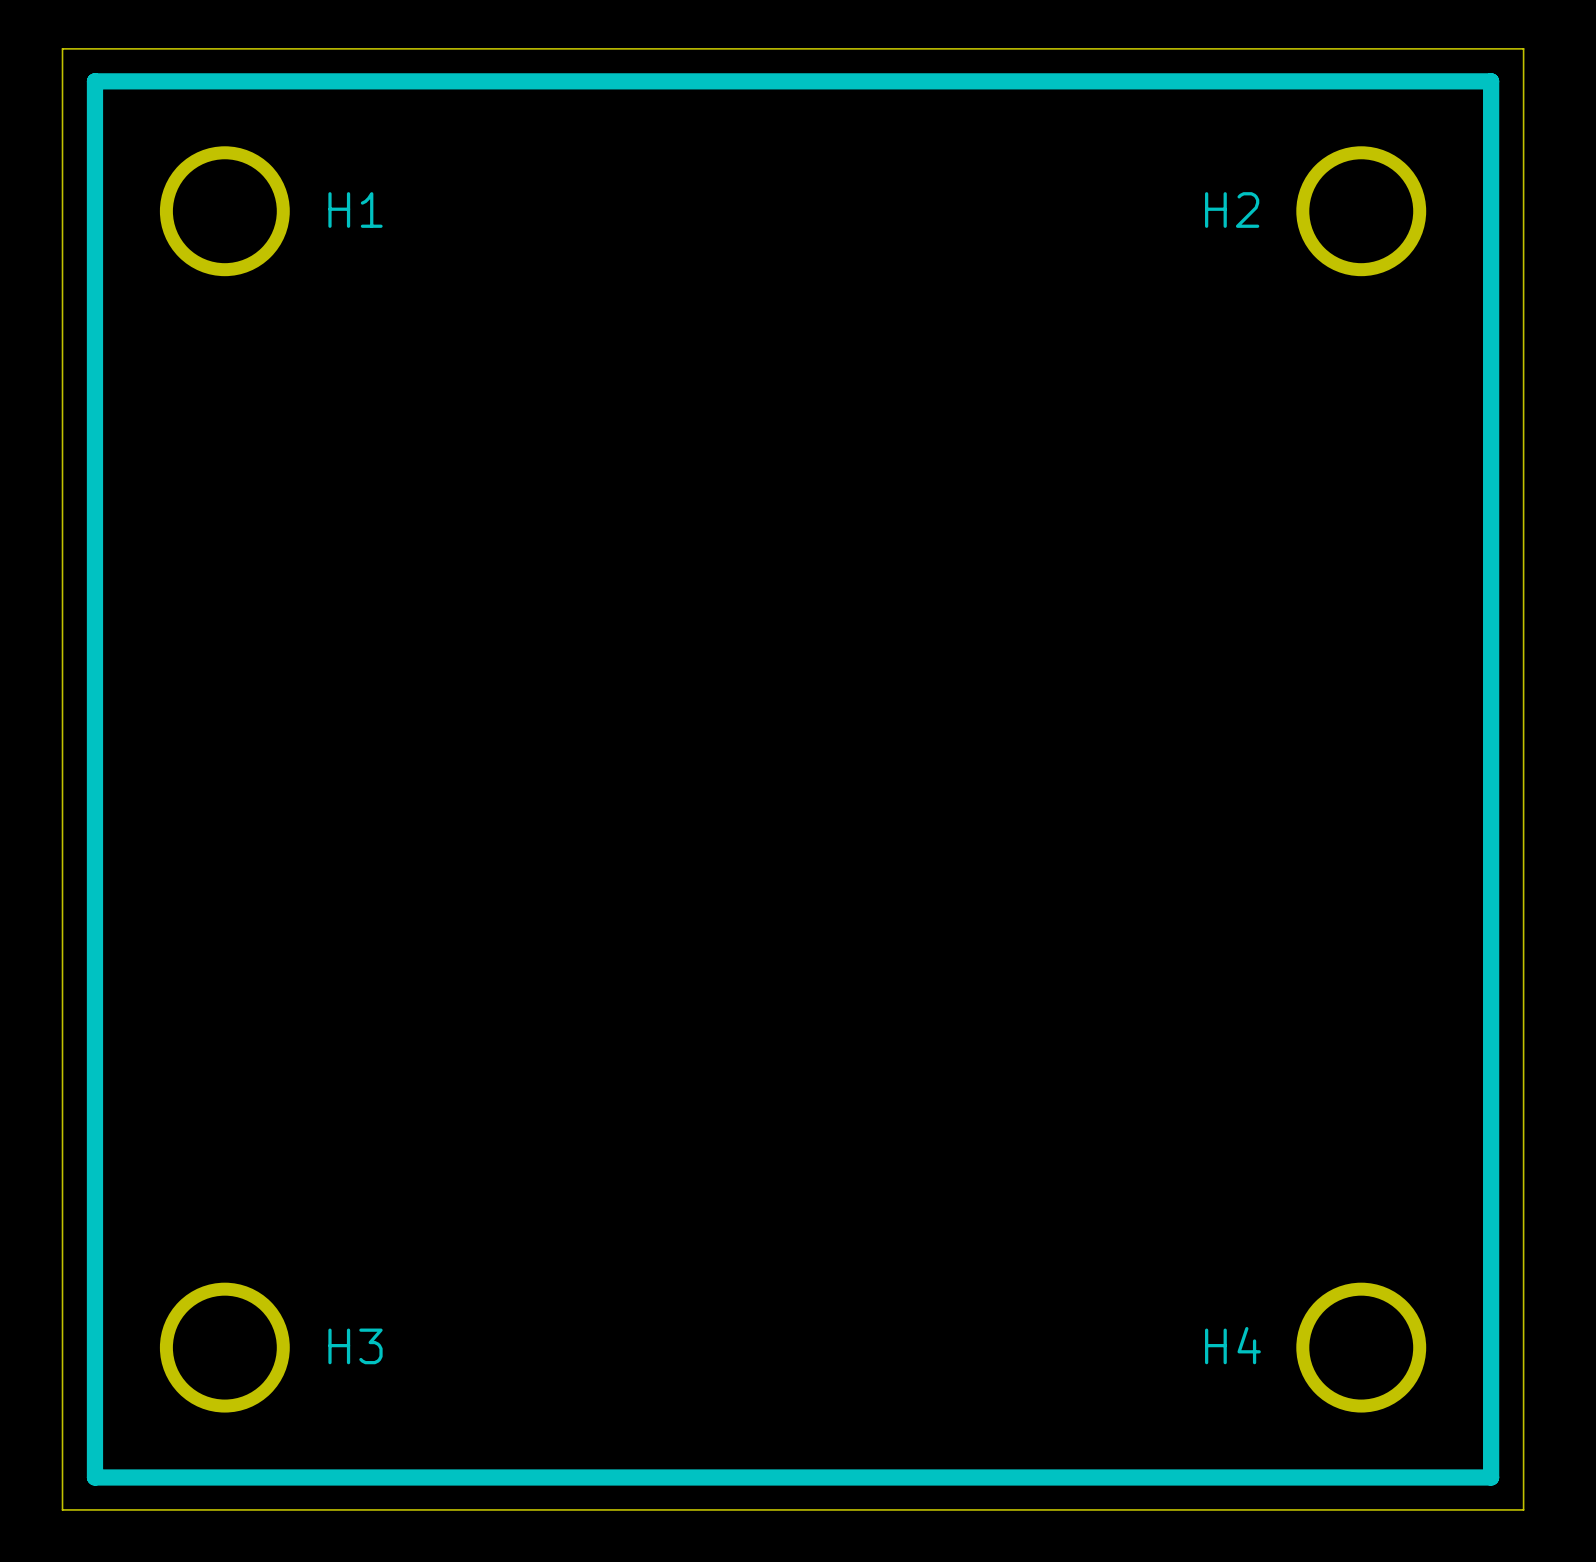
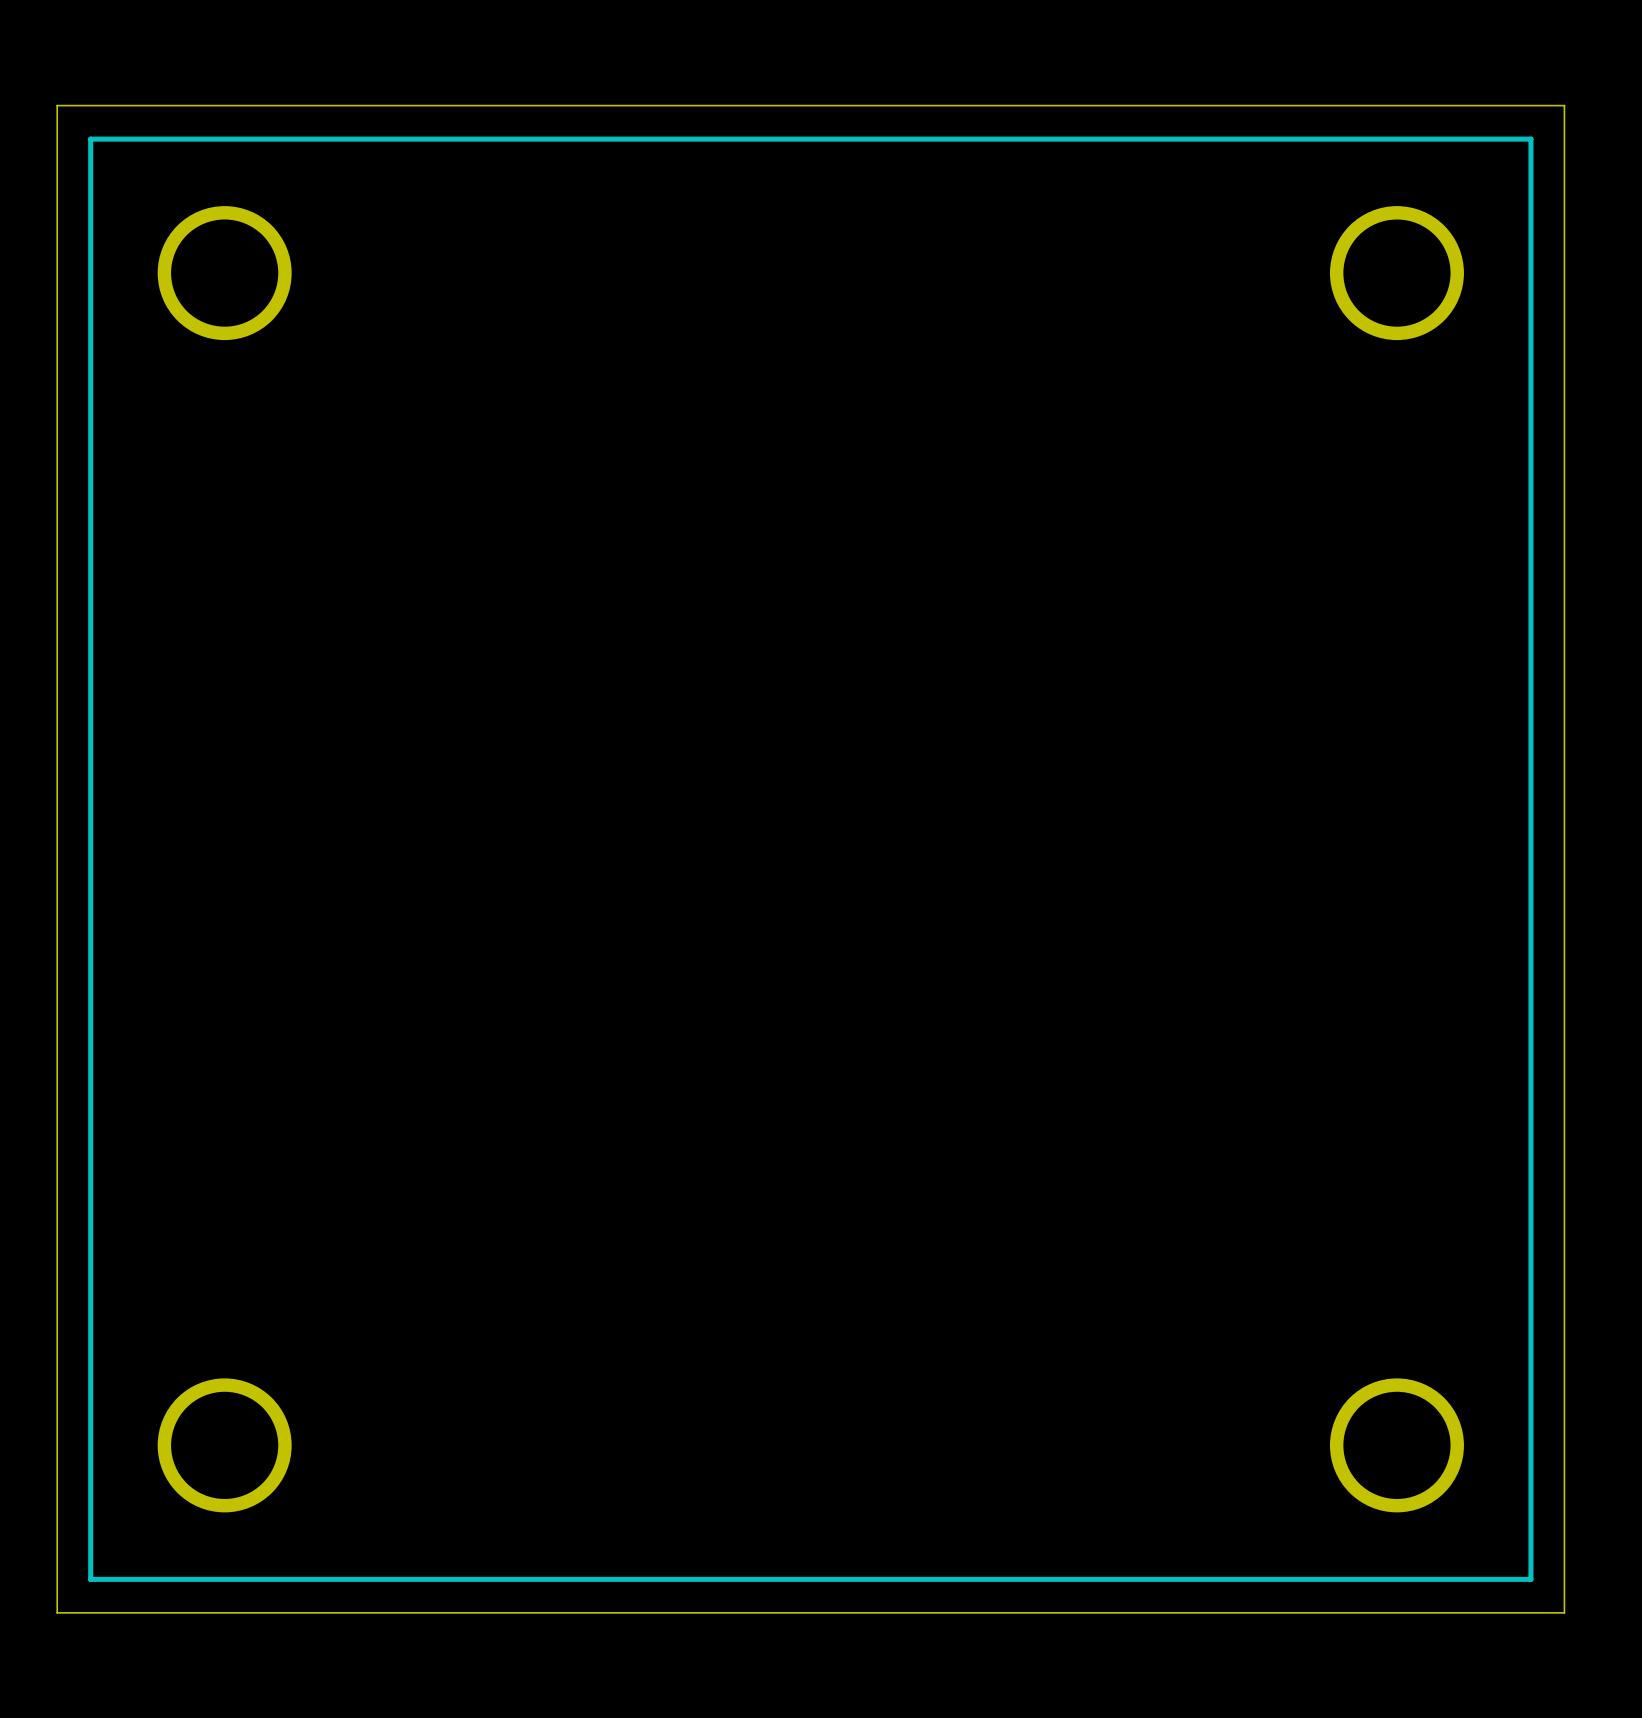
line width: thick (94, 81) (1491, 81) (1491, 1477) (94, 1477) (94, 81) -> thin (90, 139) (1530, 139) (1530, 1579) (90, 1579) (90, 139)
H1 name: H1 (355, 210) -> none
H2 name: H2 (1232, 210) -> none
H4 name: H4 (1232, 1345) -> none
H3 name: H3 (355, 1346) -> none

